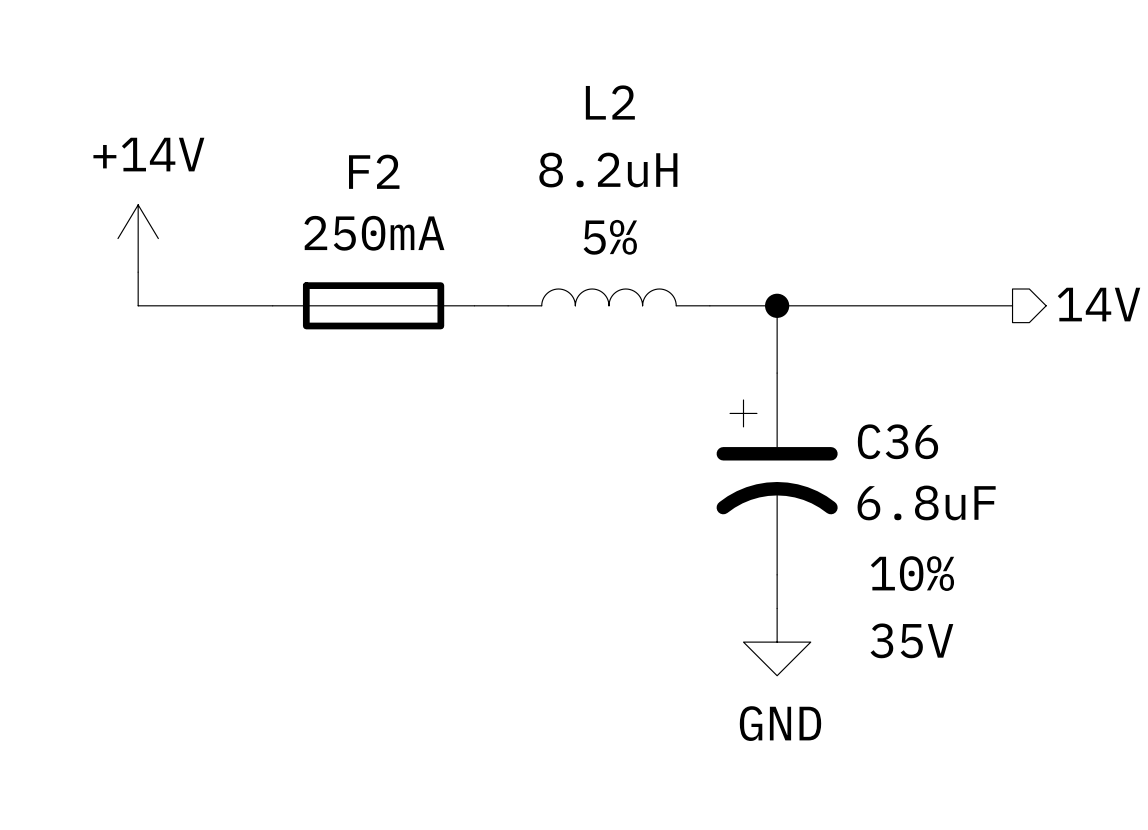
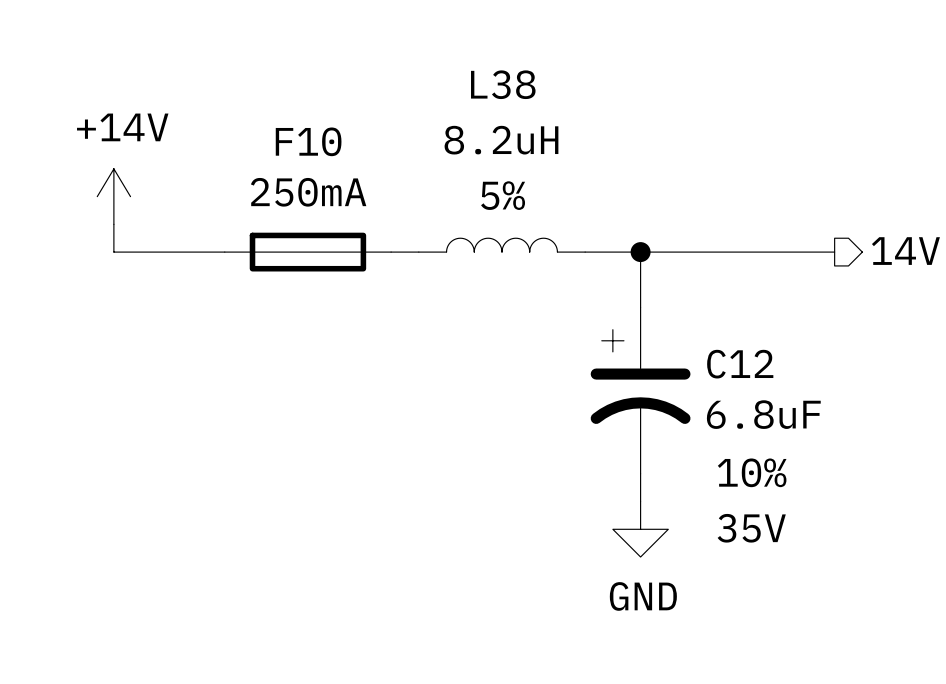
L2 name: L2 (610, 102) -> L38 (503, 84)
F2 name: F2 (374, 171) -> F10 (308, 141)
C36 name: C36 (897, 441) -> C12 (740, 364)

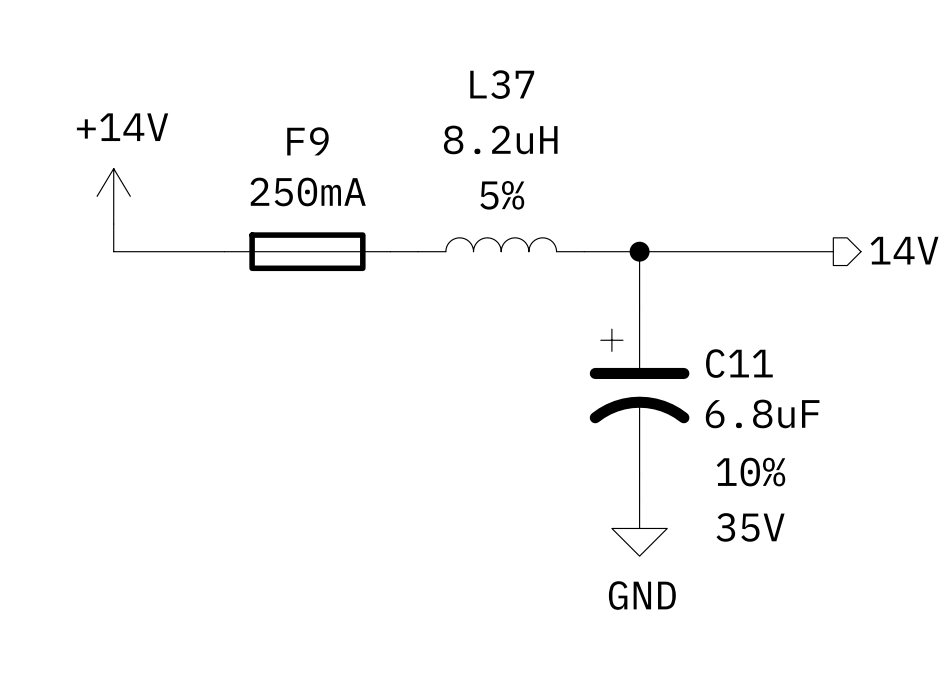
L38 name: L38 (503, 84) -> L37 (502, 84)
F10 name: F10 (308, 141) -> F9 (307, 141)
C12 name: C12 (740, 364) -> C11 (739, 363)

